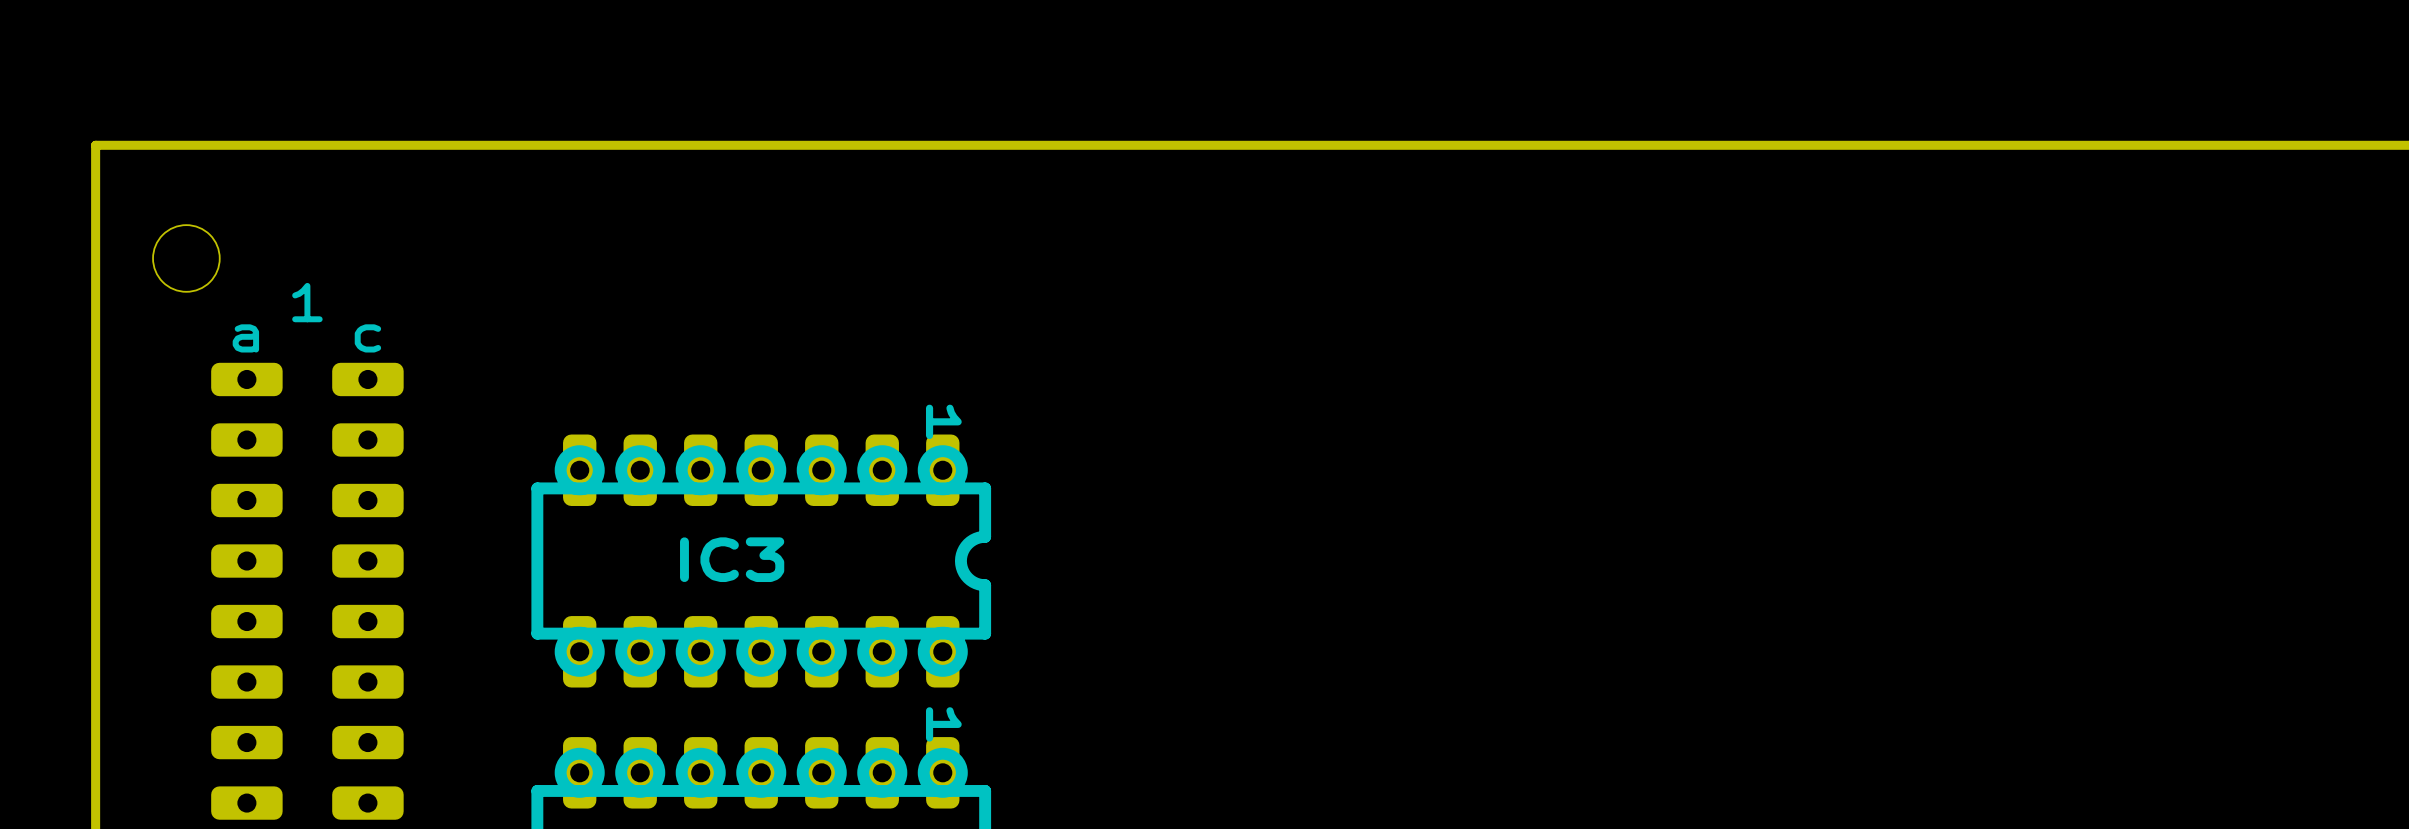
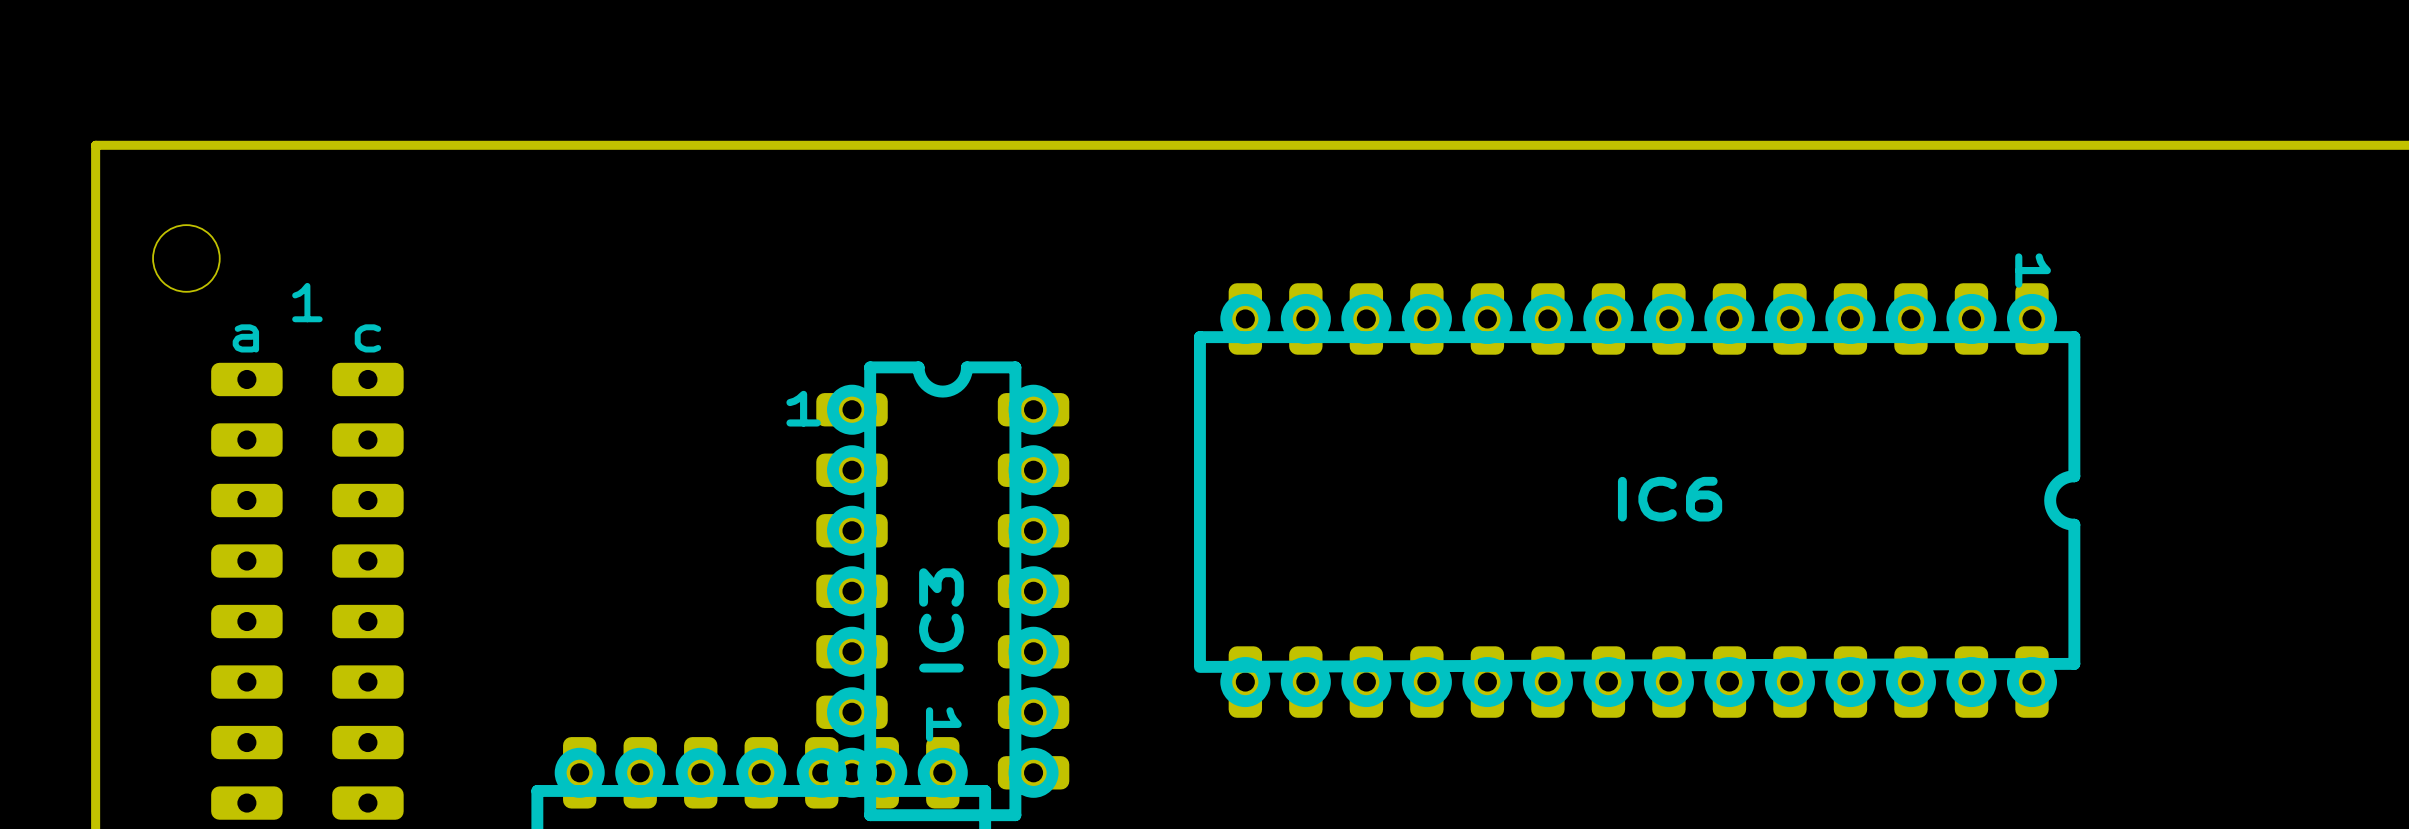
IC6: none -> (1637, 500)
IC3 rotation: 0° (761, 561) -> 90° counterclockwise (942, 591)

